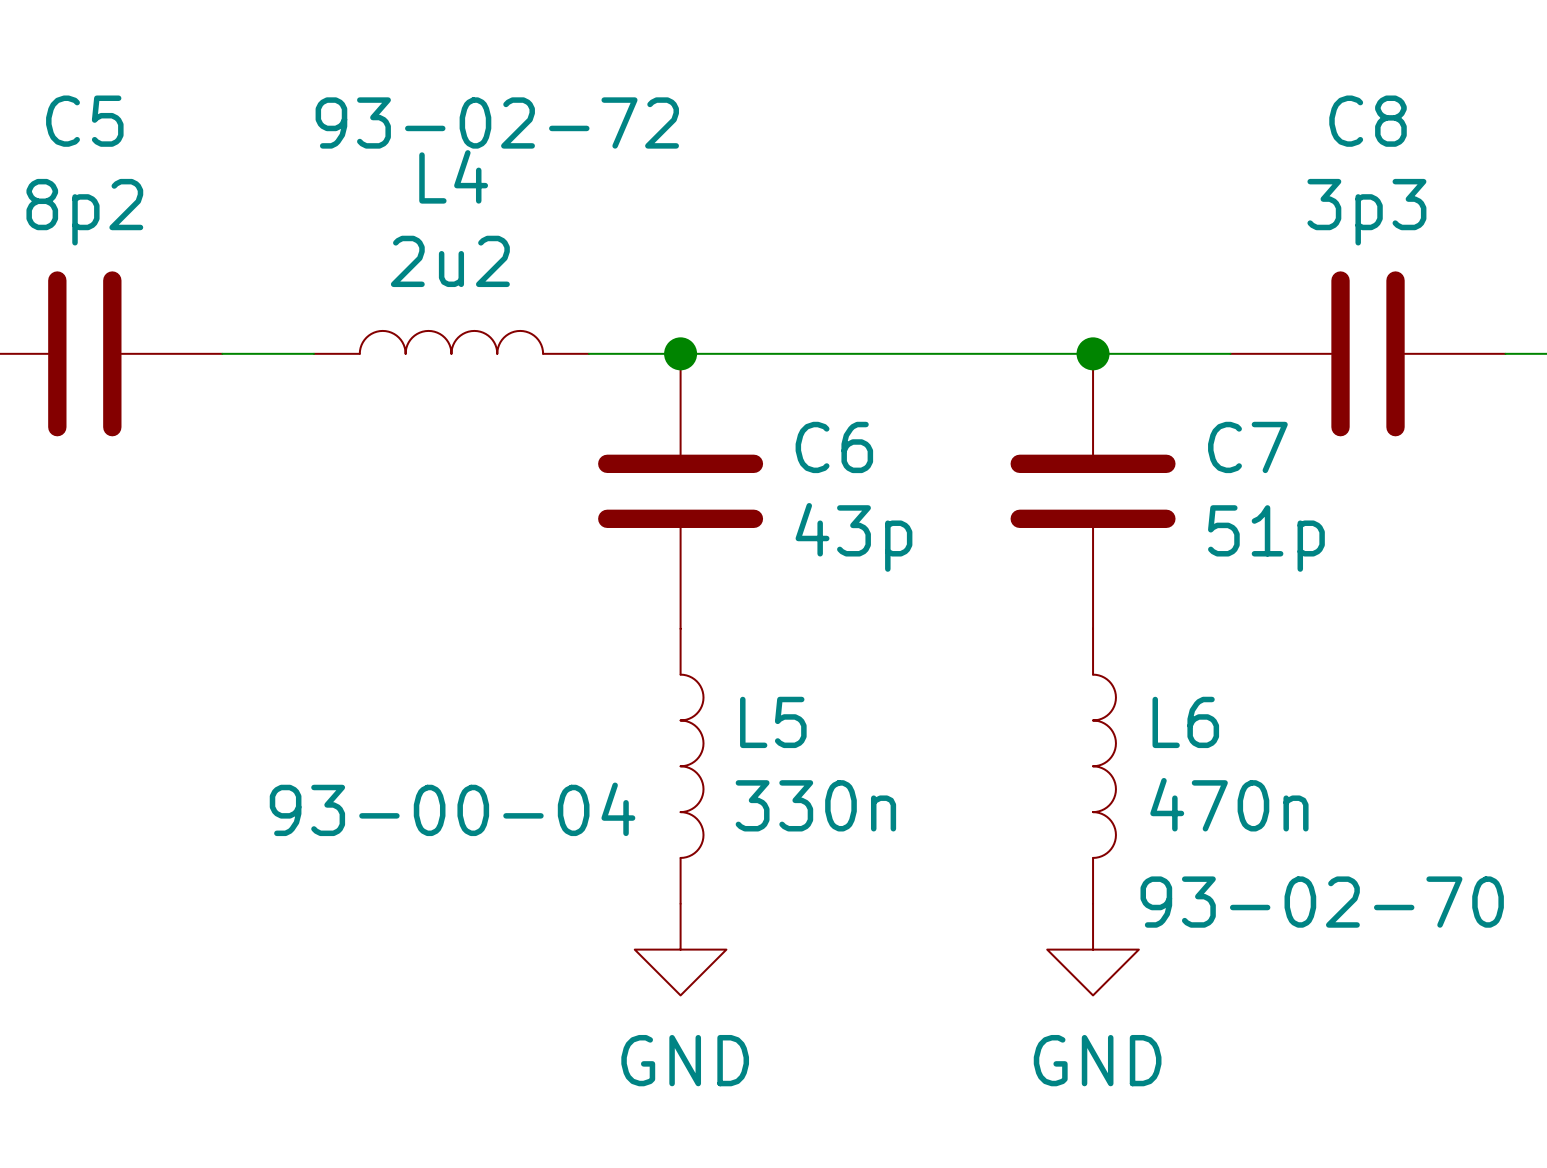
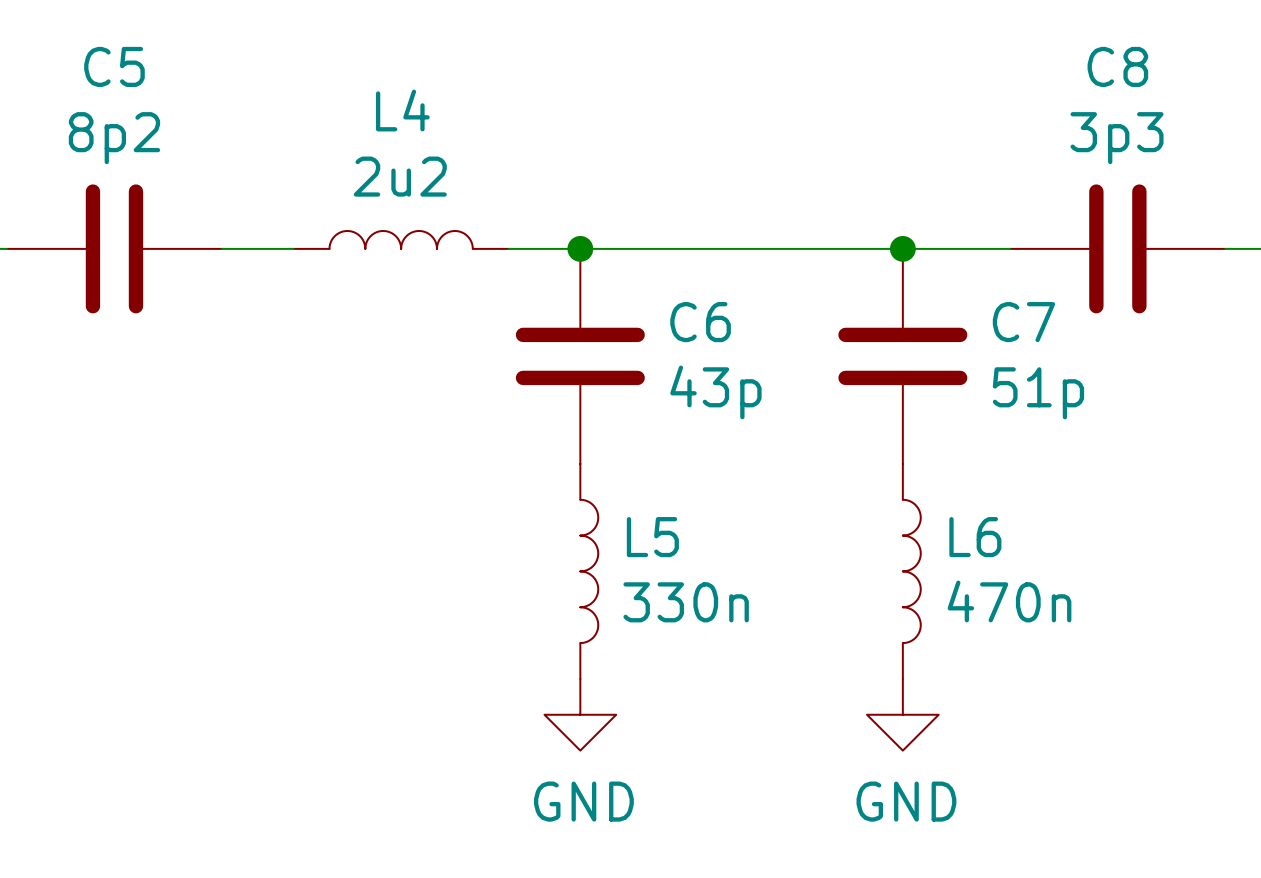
L4 text: 93-02-72 (497, 122) -> none
L5 text: 93-00-04 (452, 809) -> none
L6 text: 93-02-70 (1322, 902) -> none

